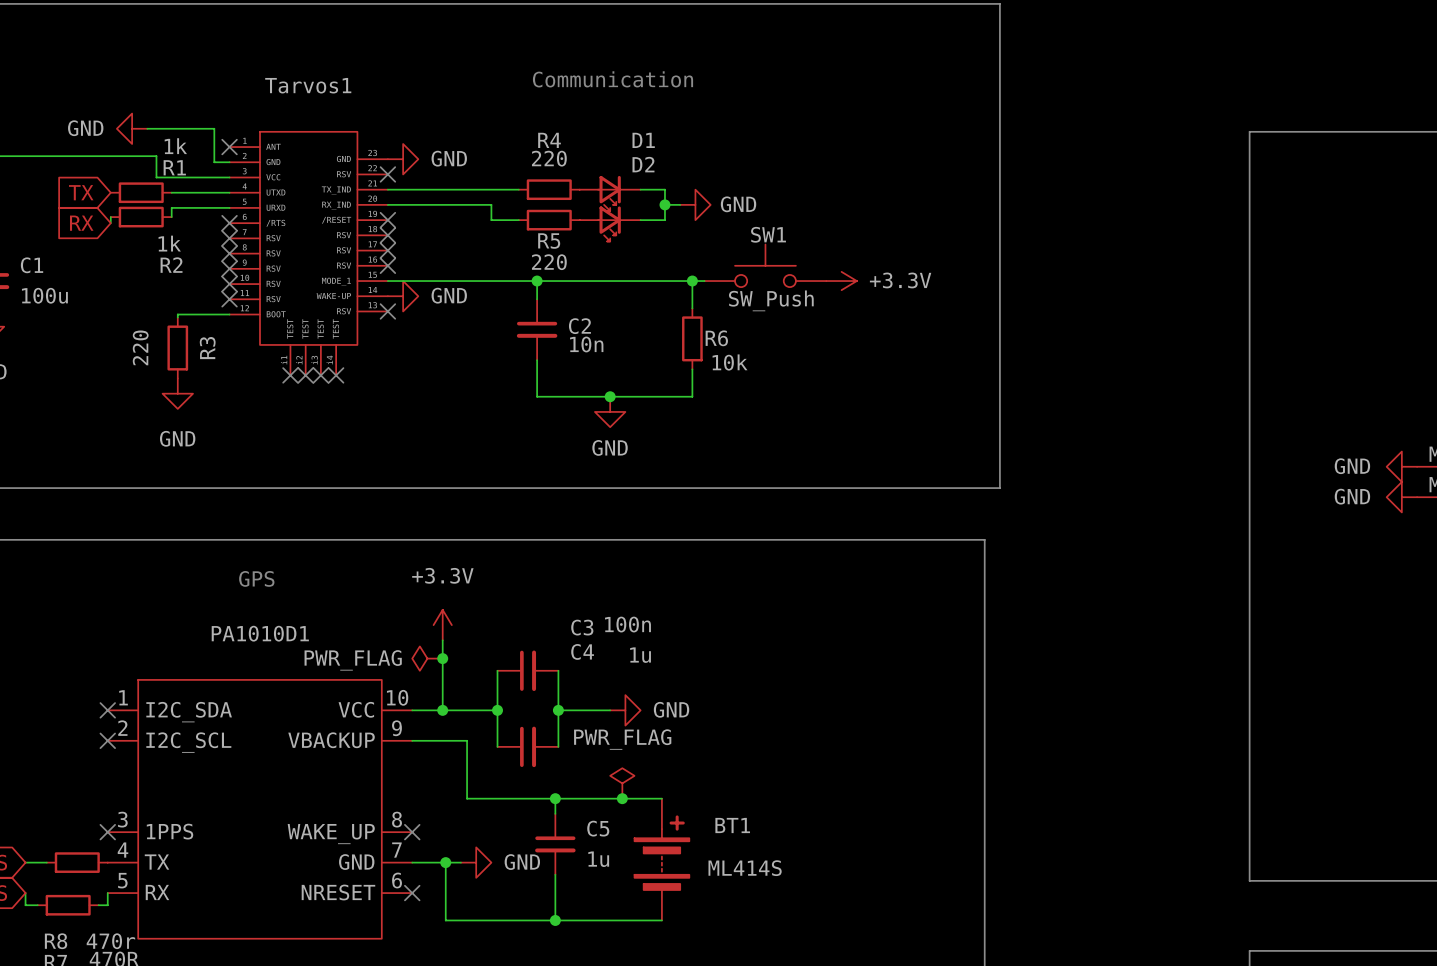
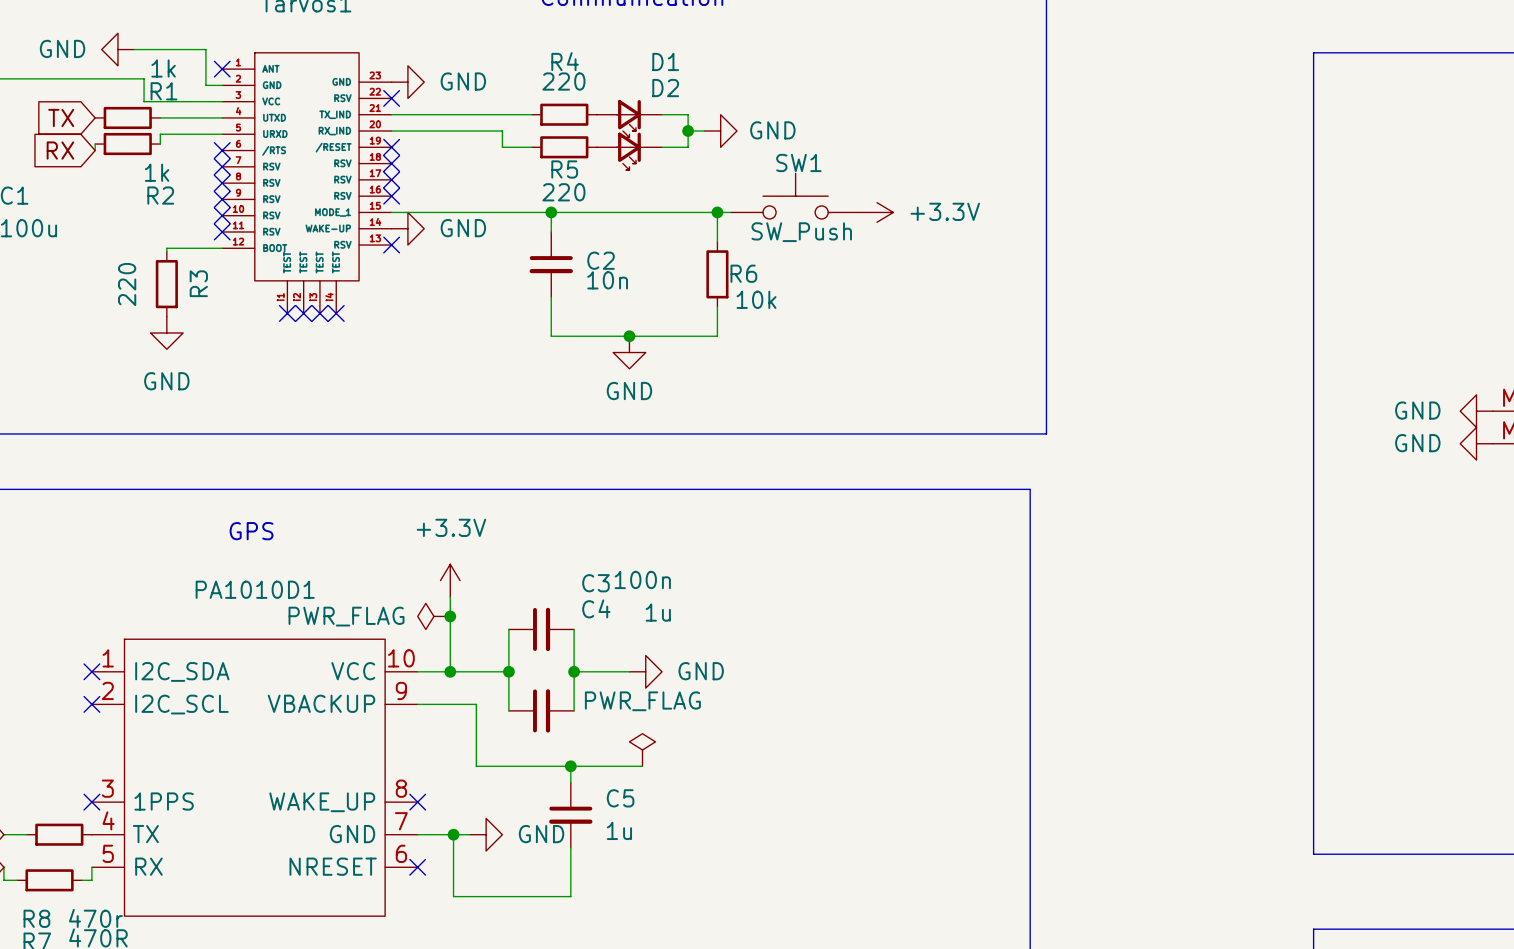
wire: (622, 798) (661, 798) -> none
junction: (622, 798) -> none
BT1: ML414S (661, 859) -> none
wire: (555, 920) (661, 920) -> none
junction: (555, 920) -> none

